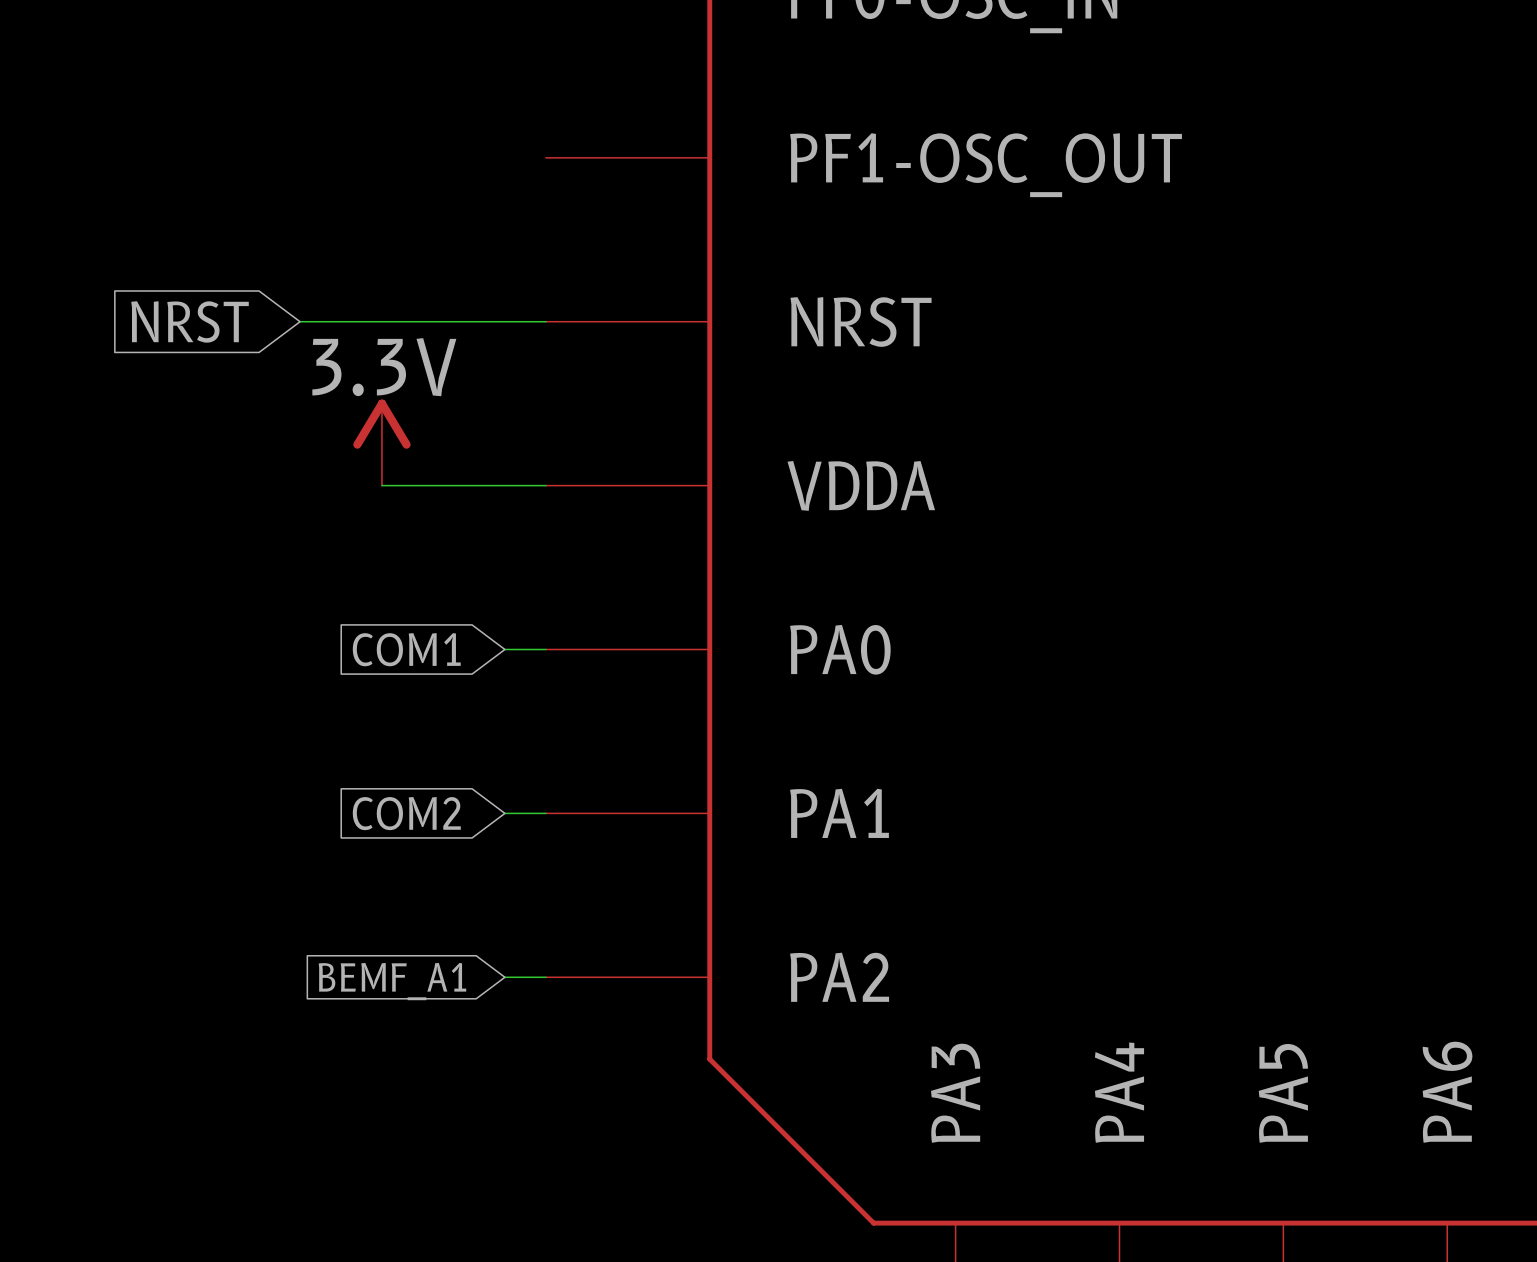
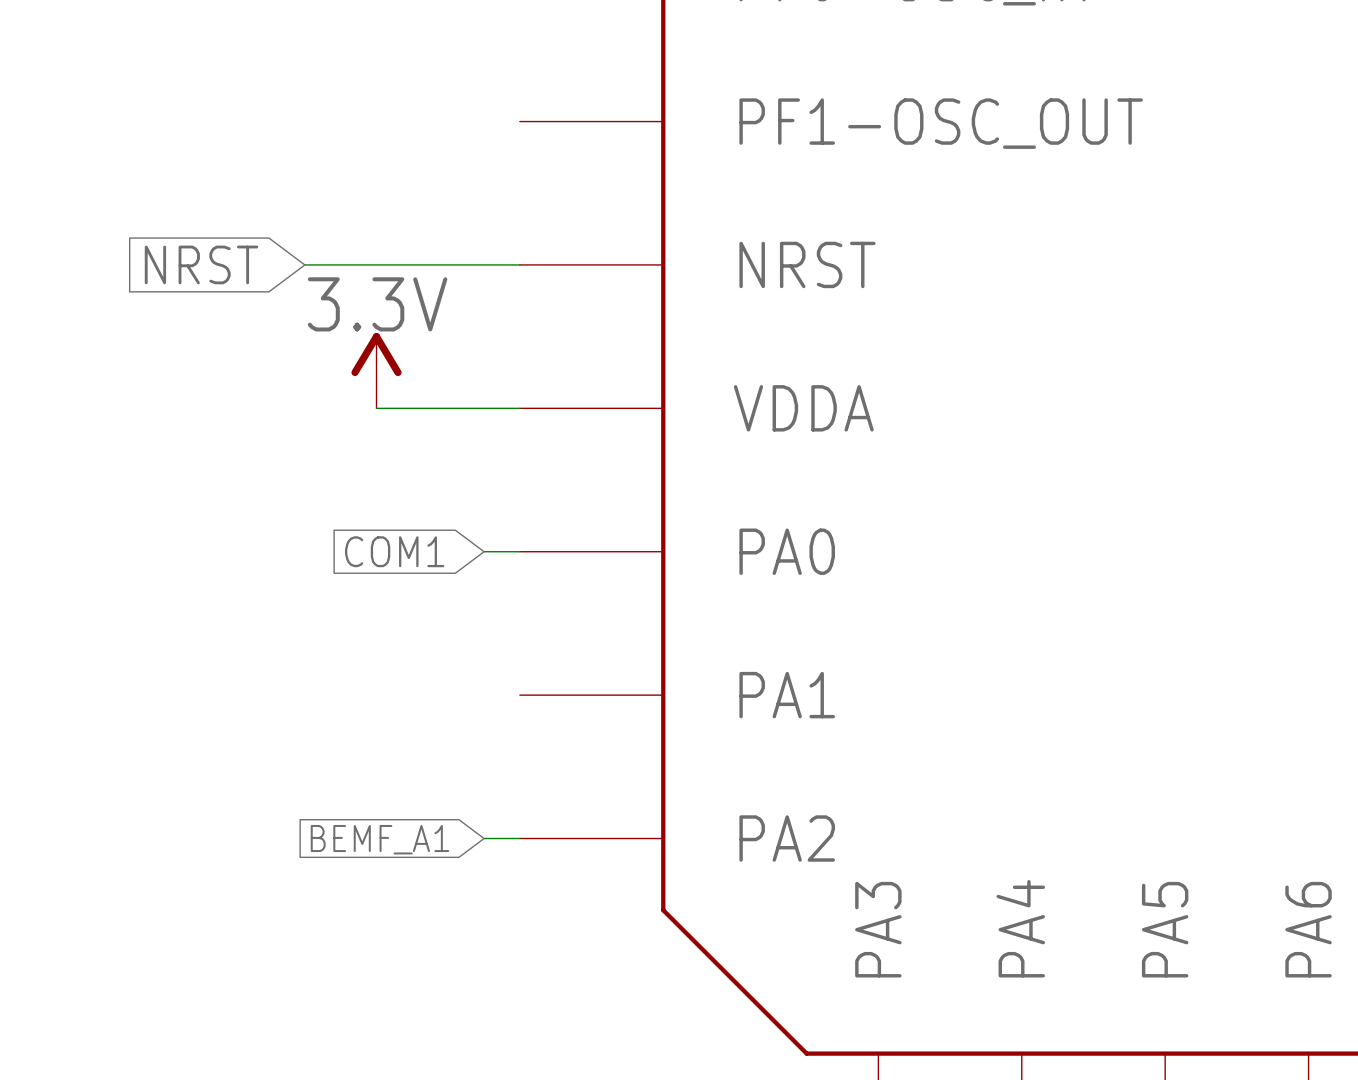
global label: COM2 (406, 813) -> none
wire: (504, 813) (545, 813) -> none

